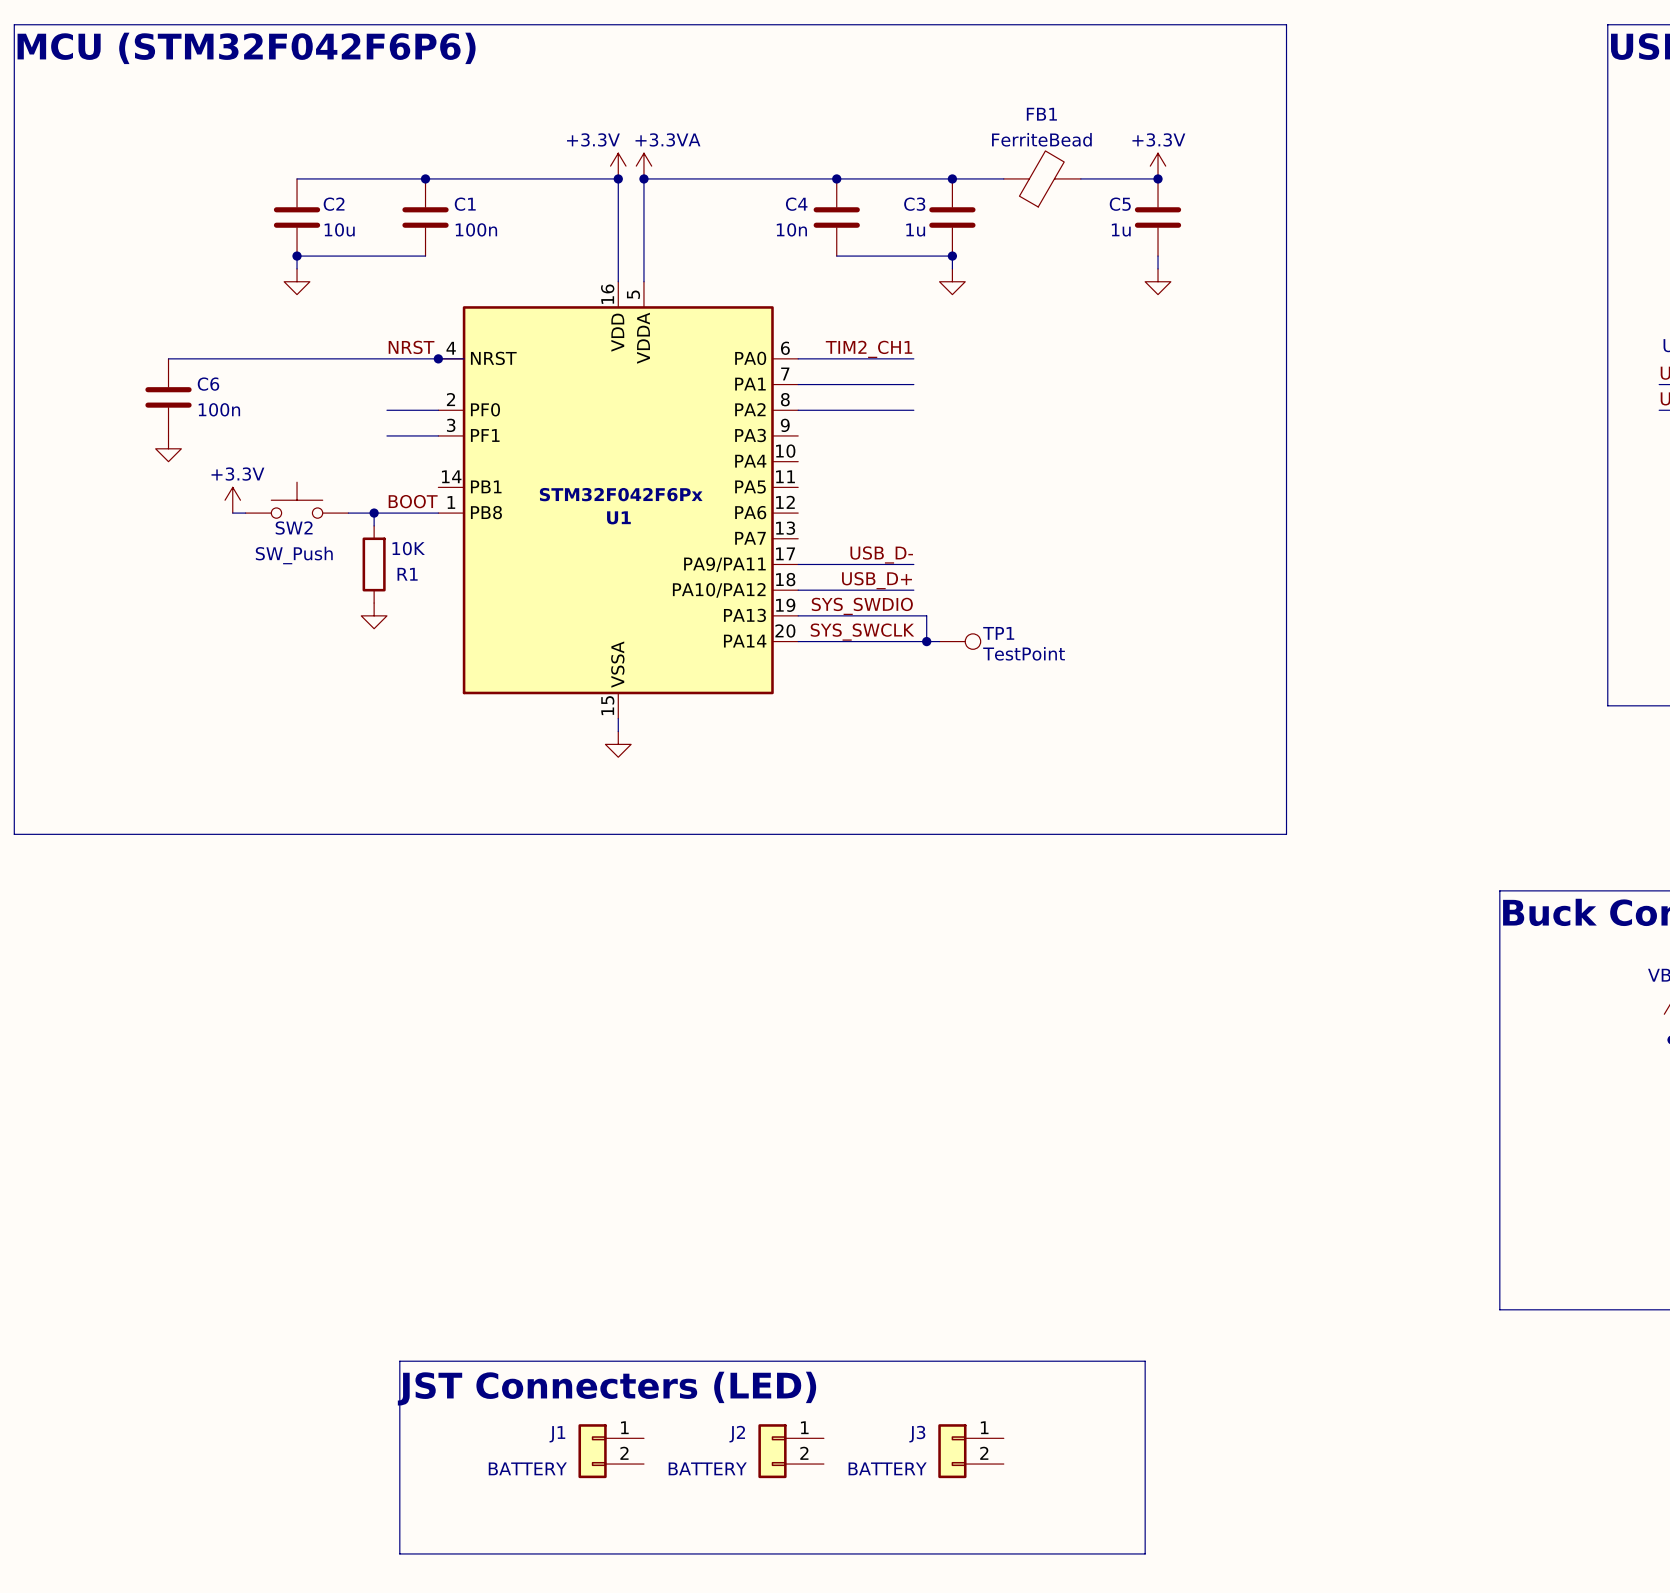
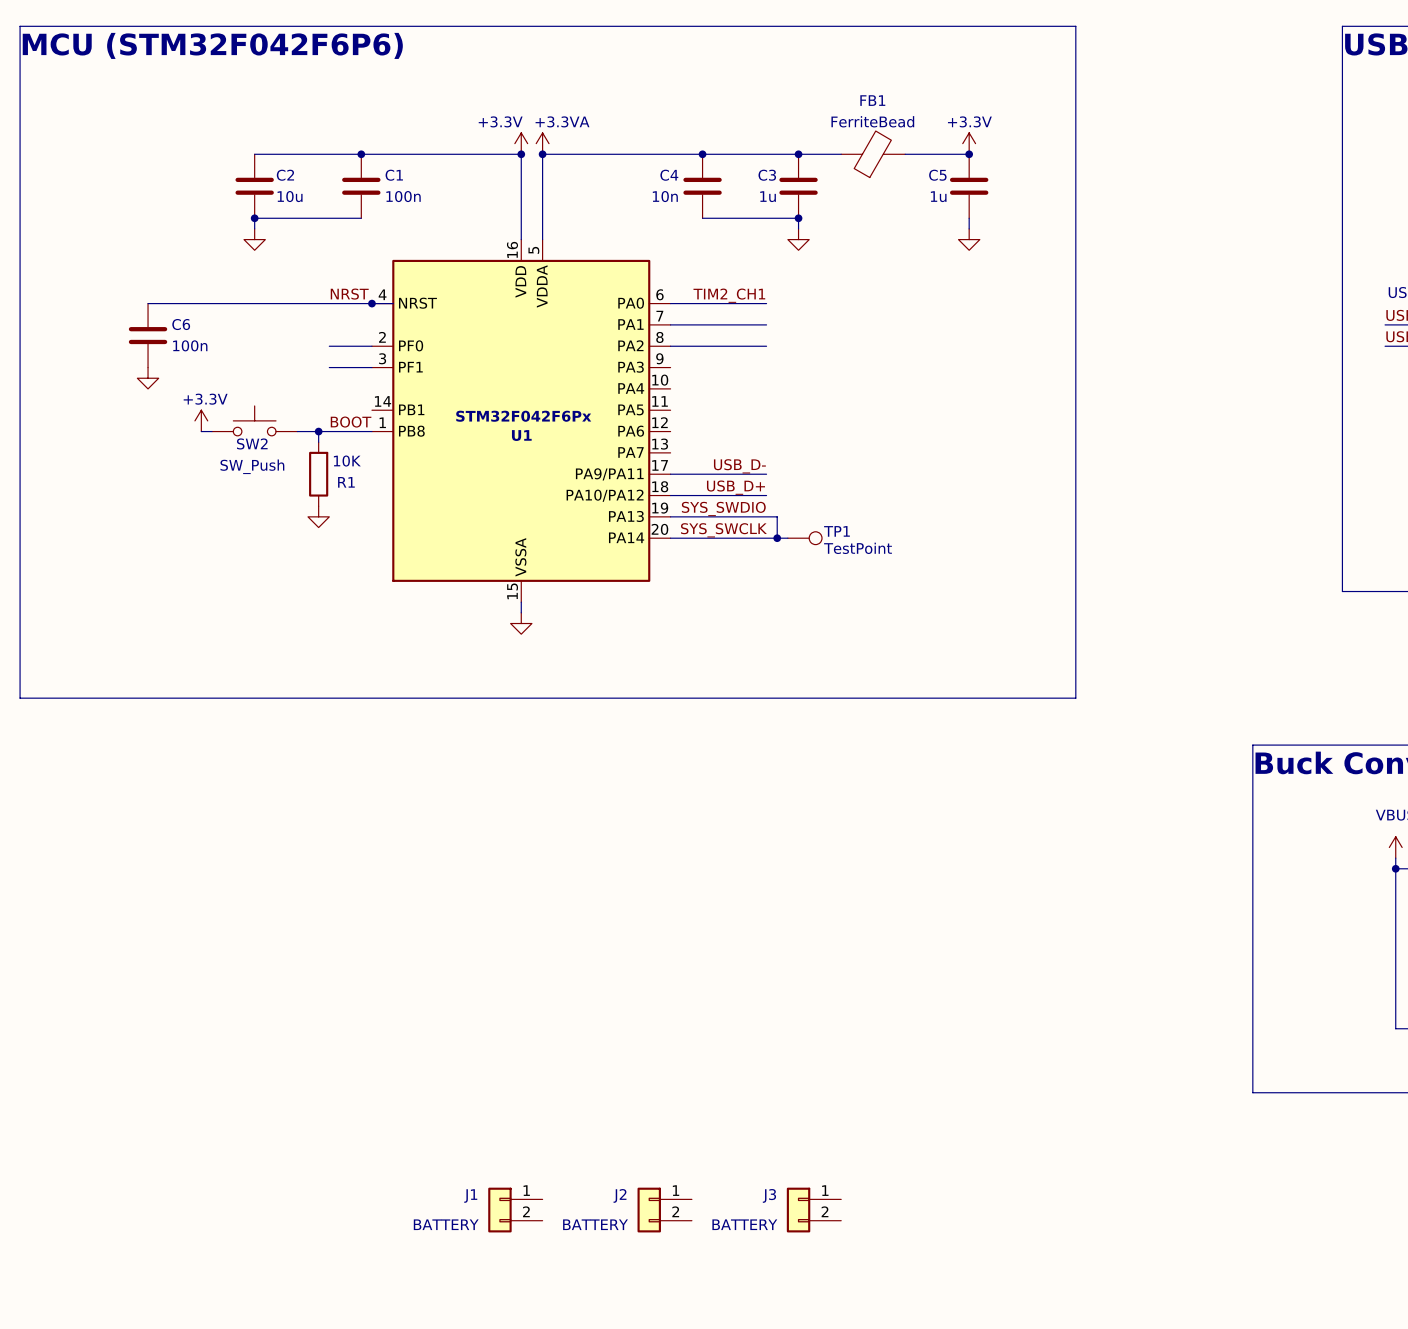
line: (399, 1361) (1145, 1361) (1145, 1553) (399, 1553) (399, 1361) -> none
text: JST Connecters (LED) (606, 1388) -> none

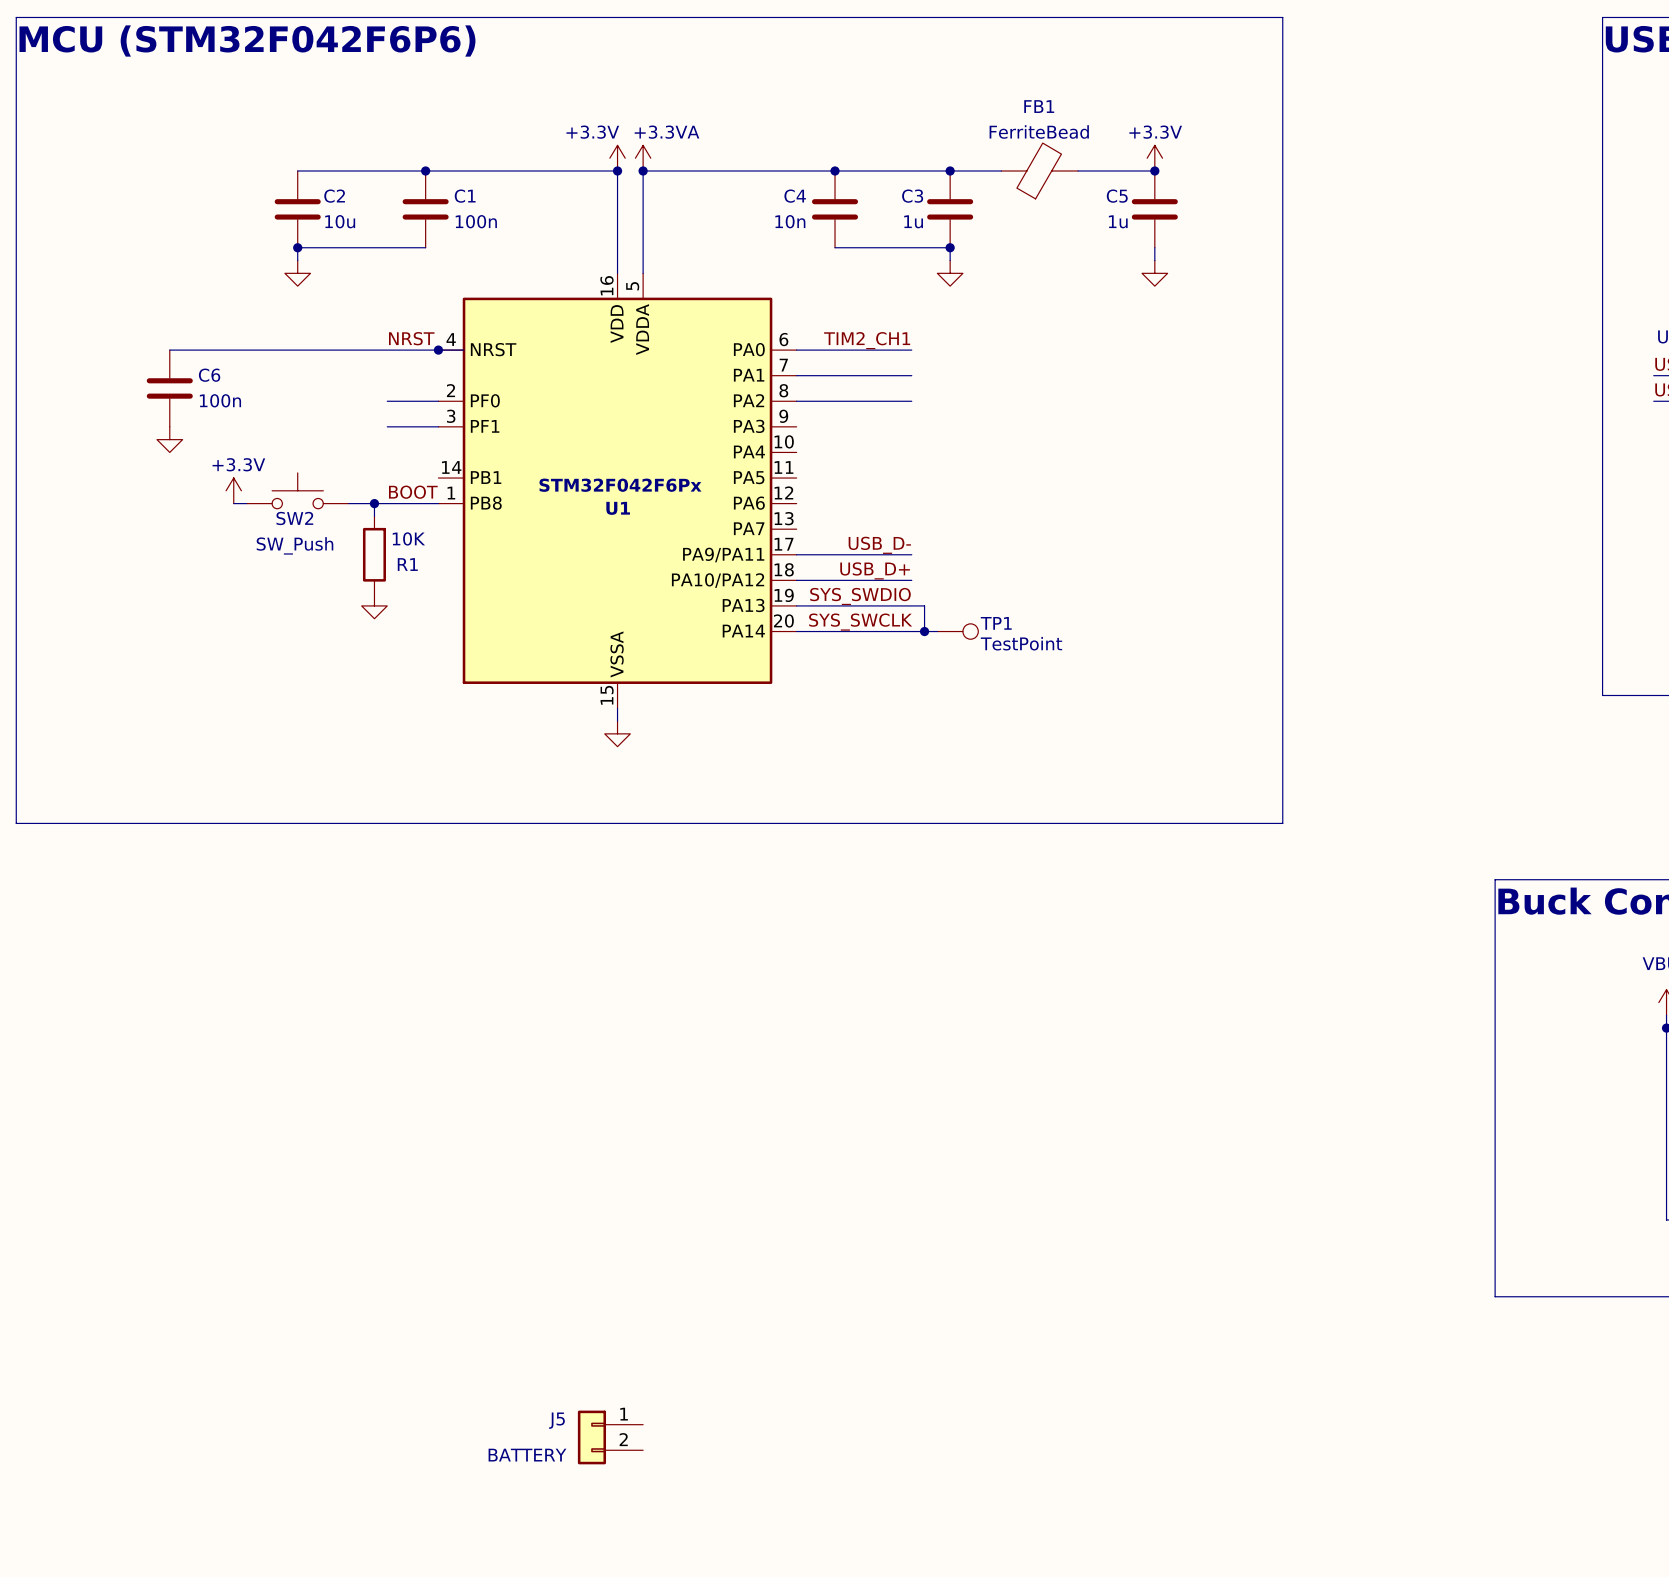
J1 name: J1 (470, 1196) -> J5 (556, 1420)
J2: BATTERY (664, 1210) -> none
J3: BATTERY (814, 1210) -> none

